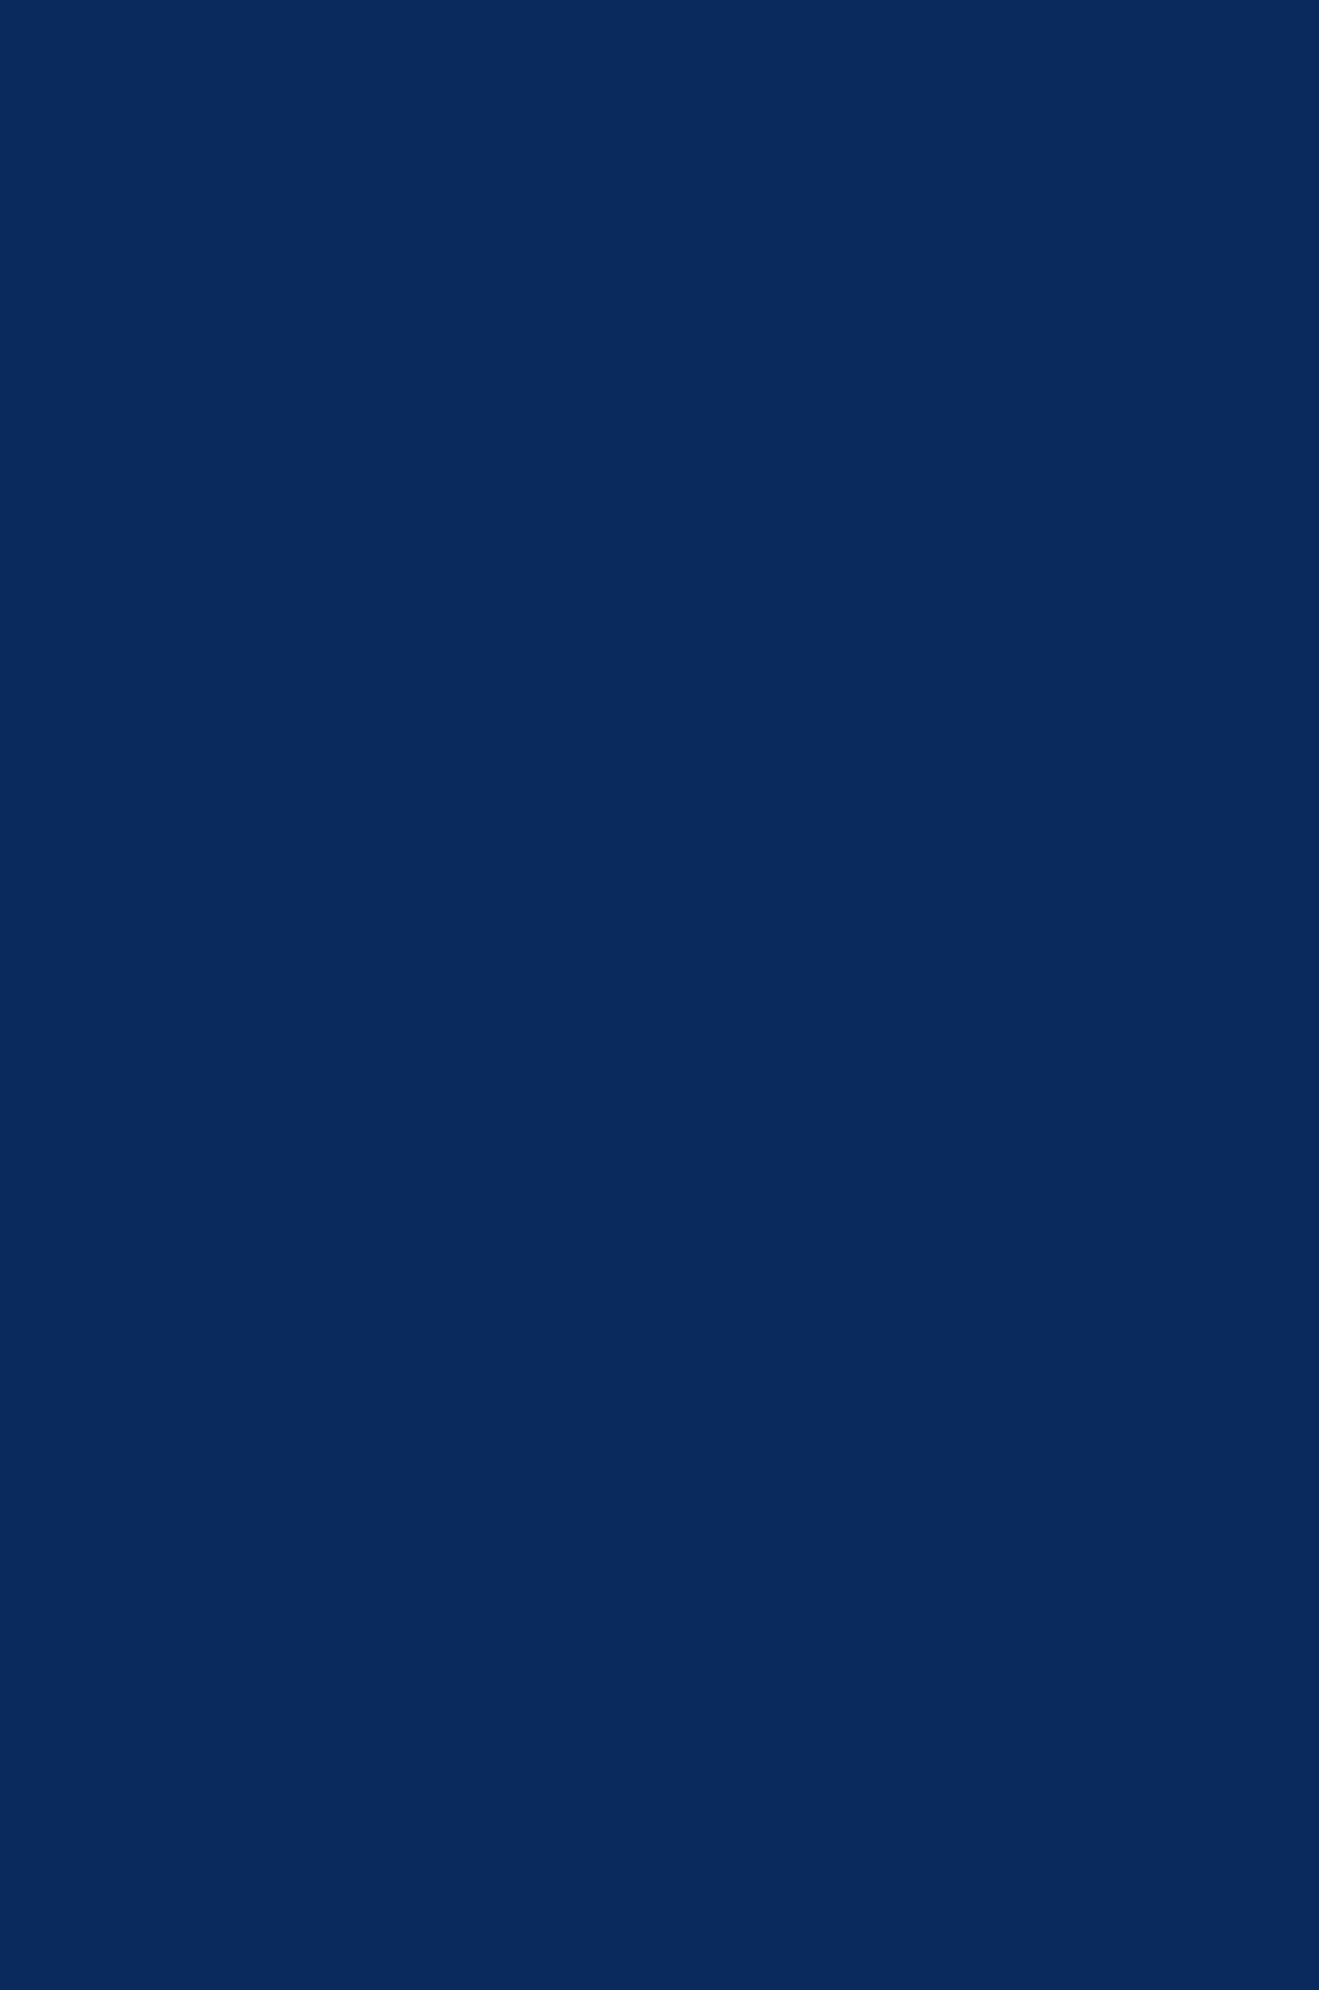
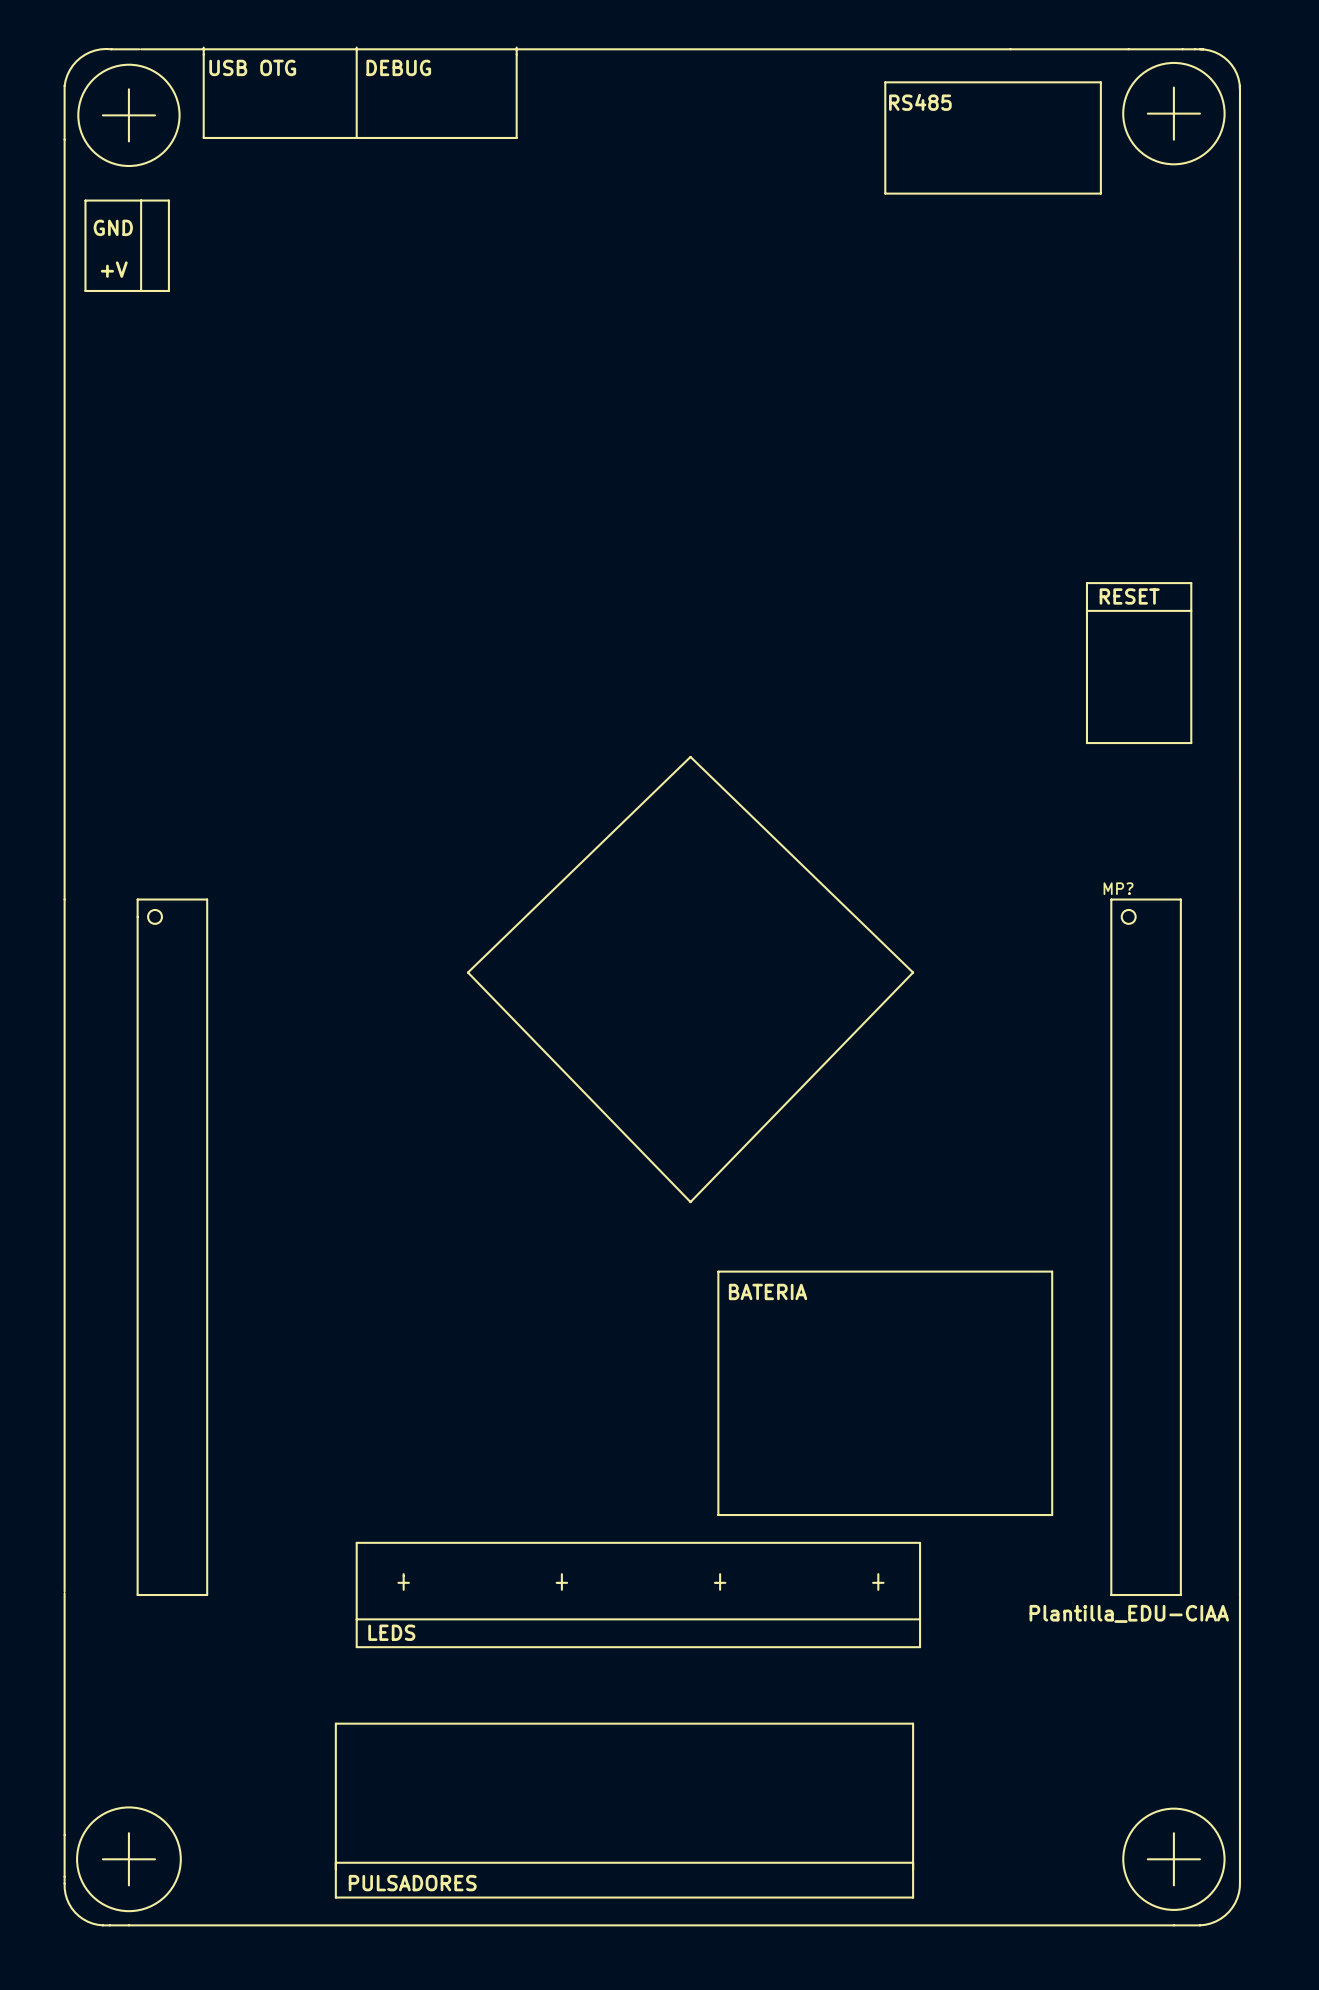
MP?: none -> Plantilla_EDU-CIAA (652, 986)

